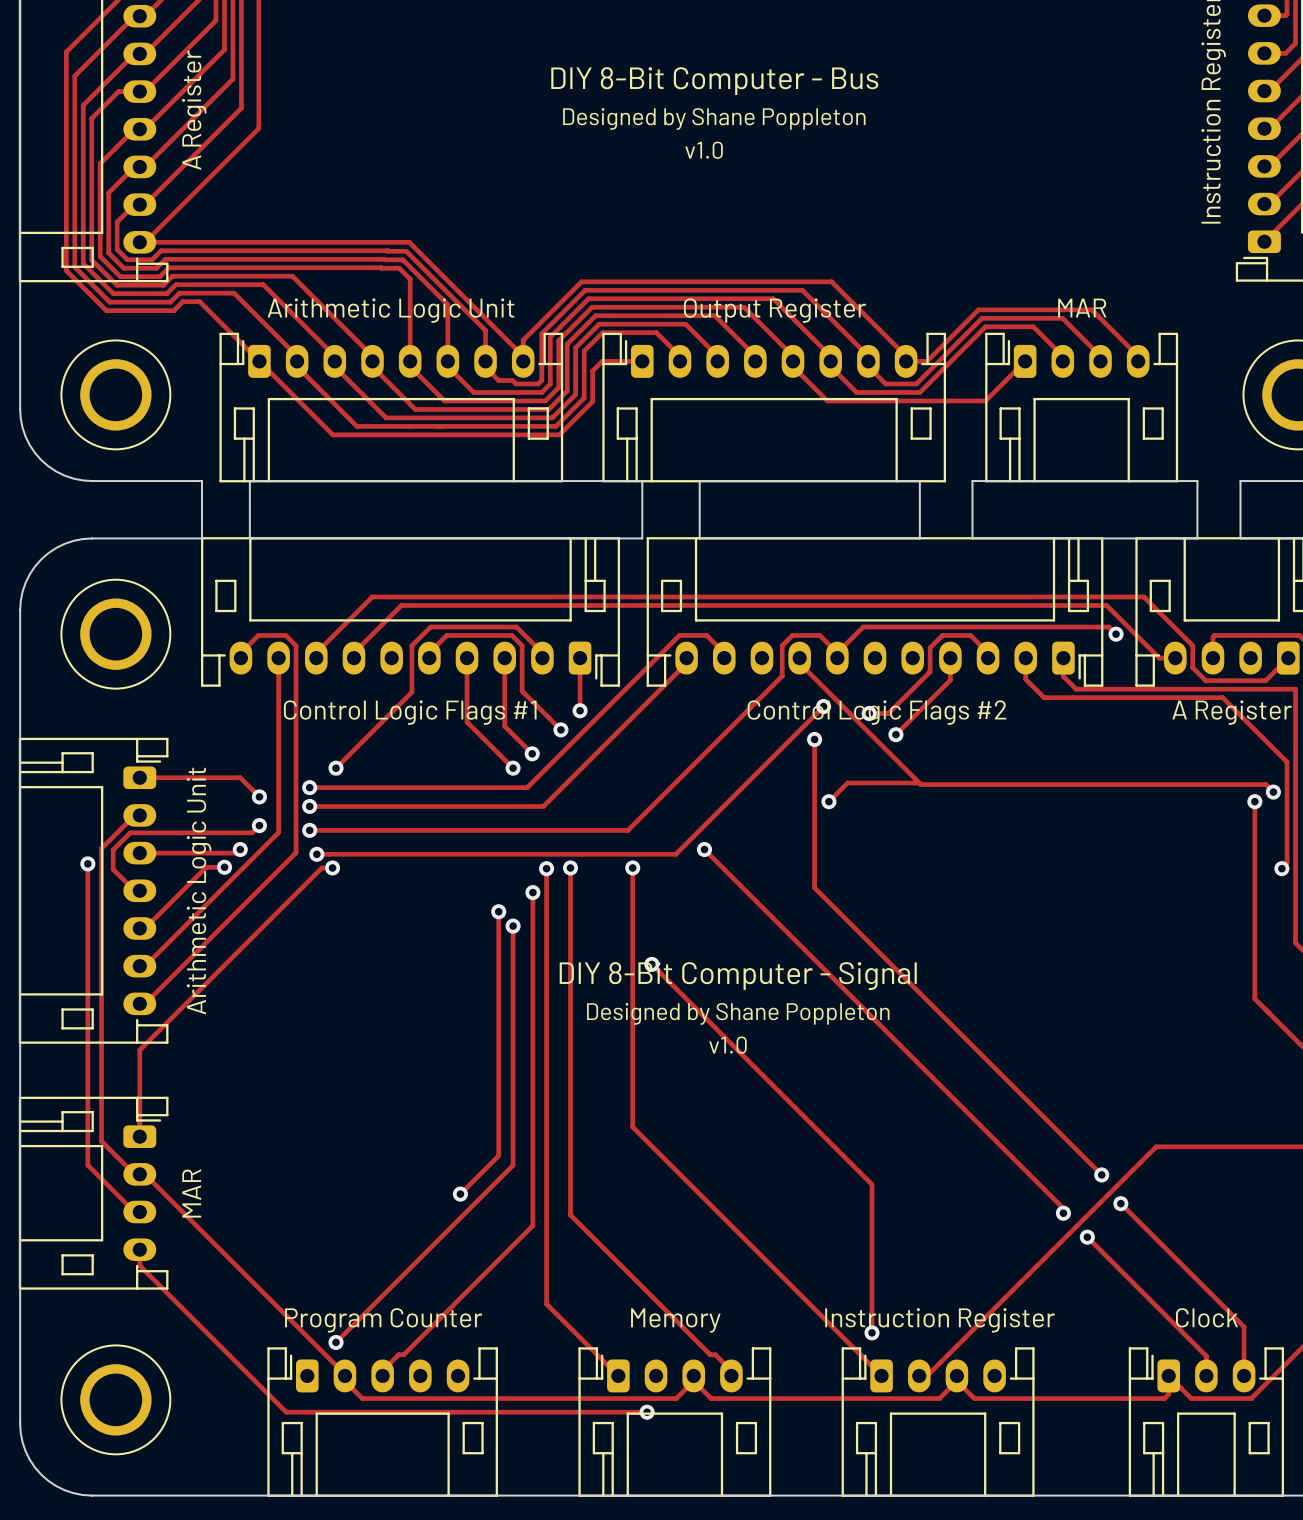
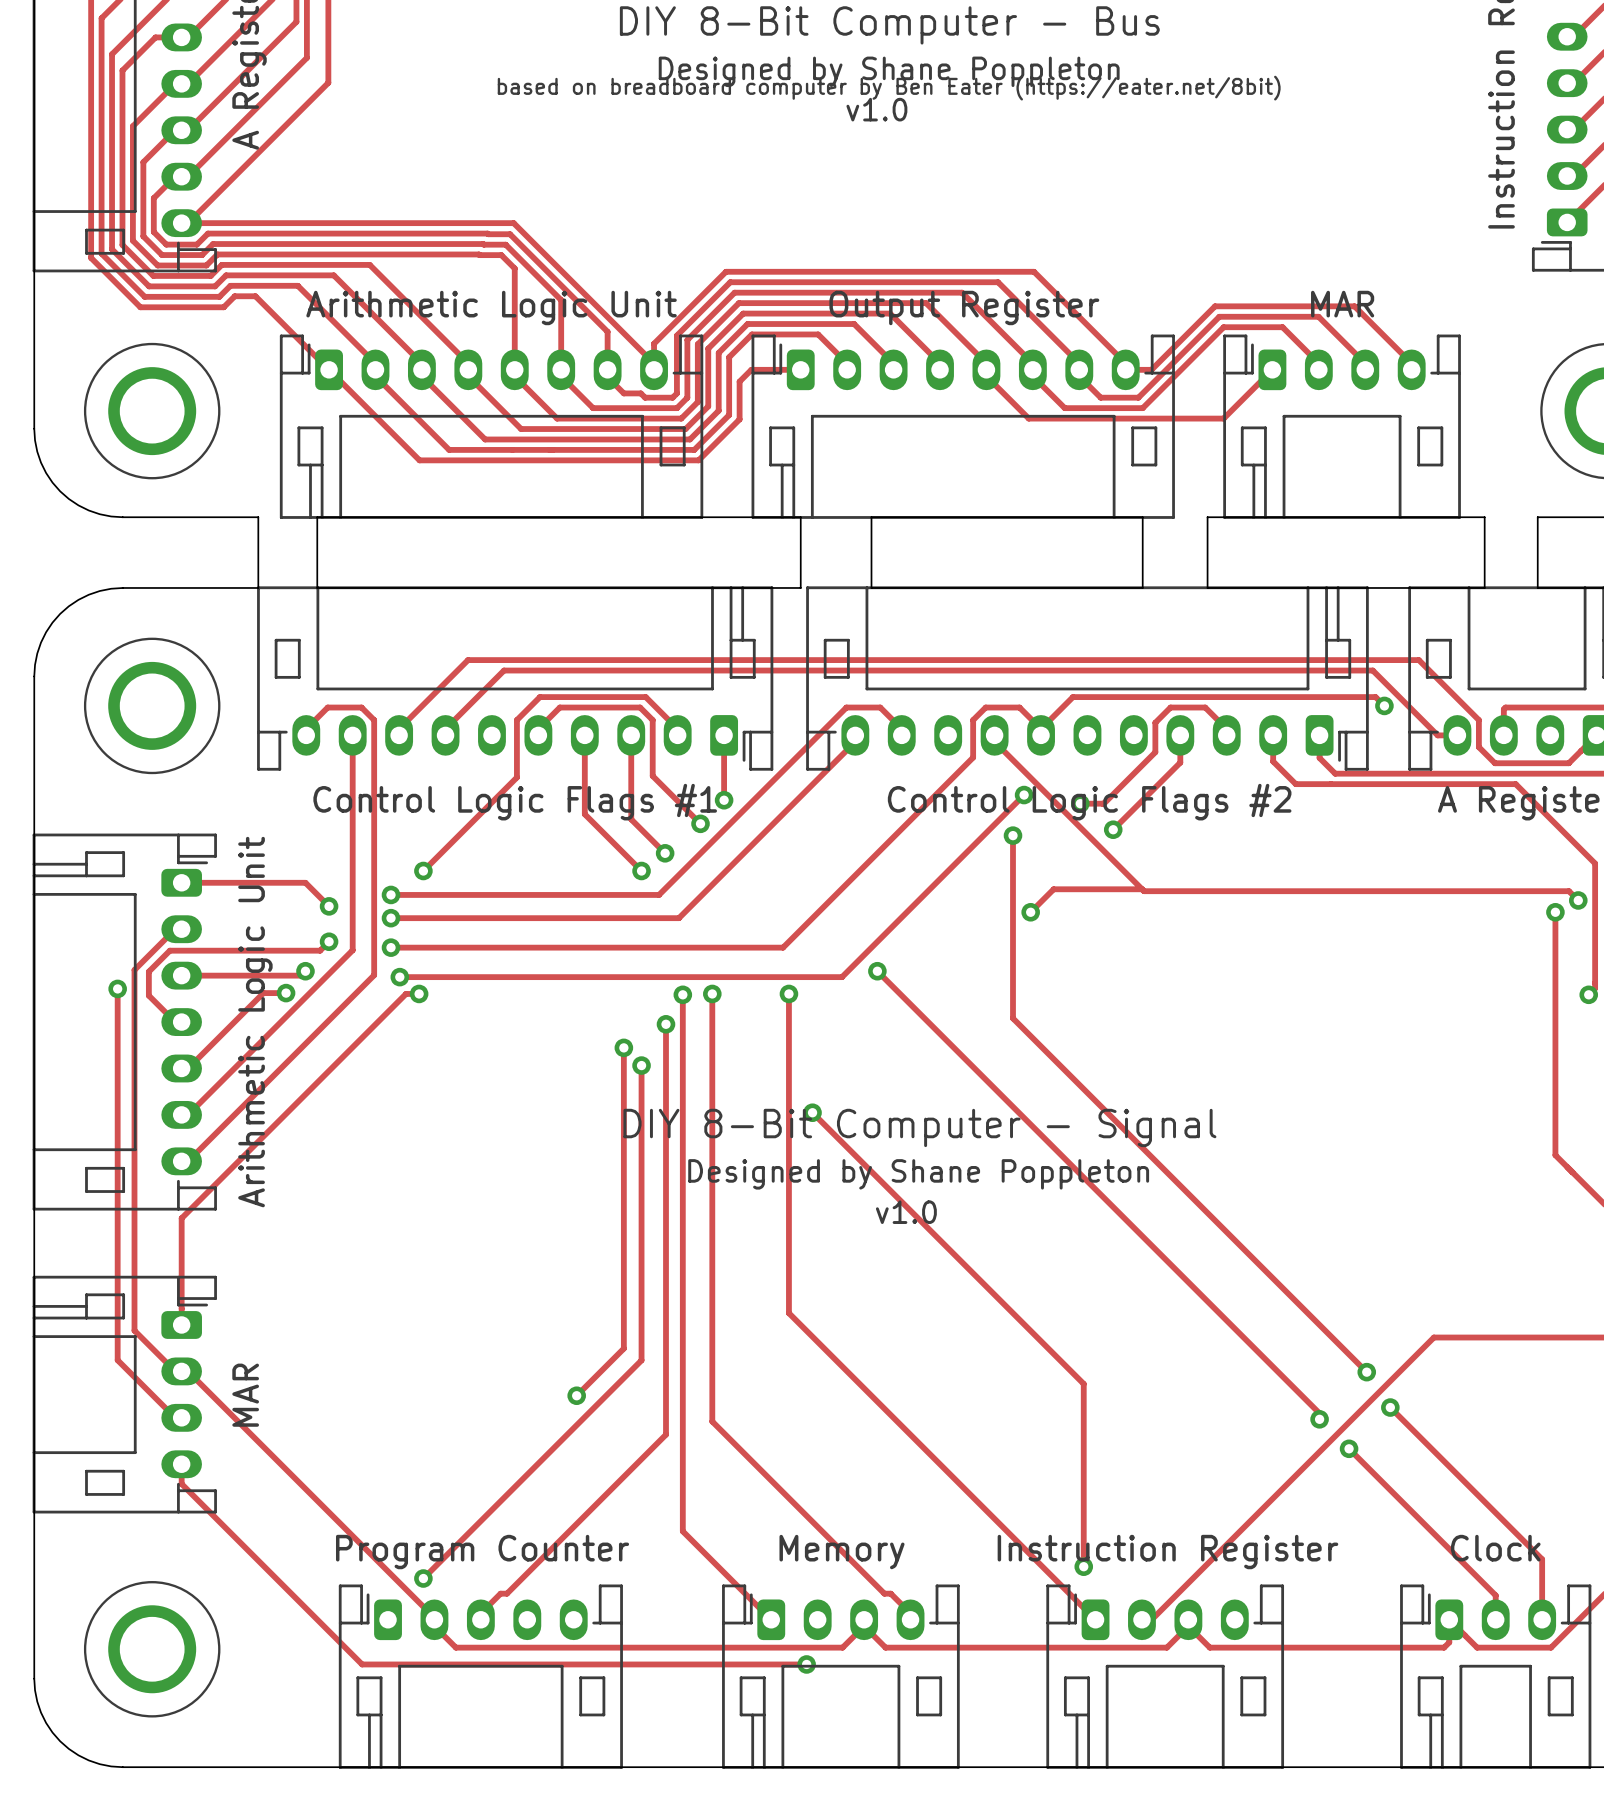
text: none -> based on breadboard computer by Ben Eater (https://eater.net/8bit) (889, 88)

